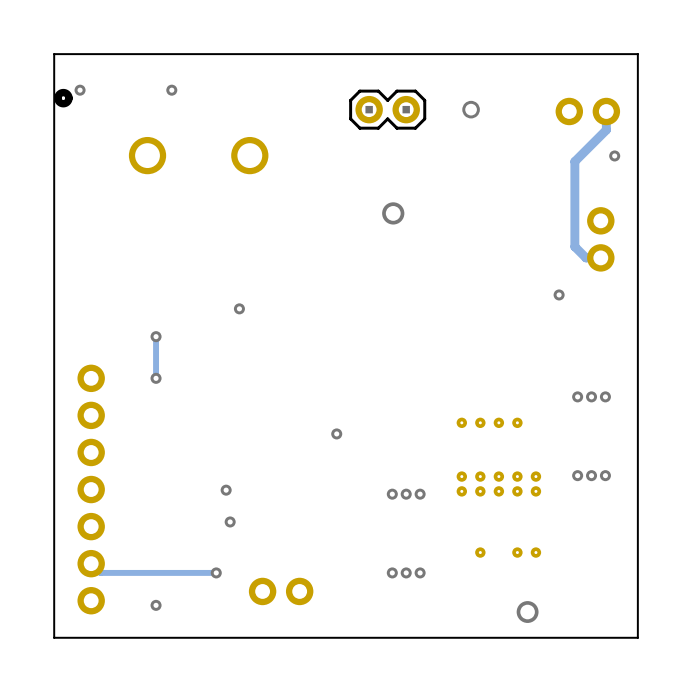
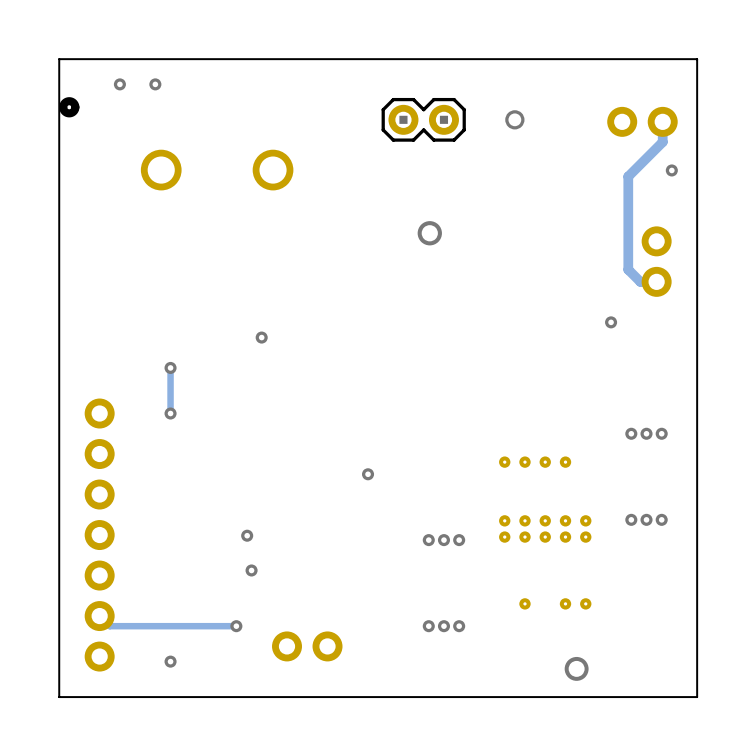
via: none -> (119, 84)
via: none -> (155, 84)
via: (80, 90) -> none
via: (171, 90) -> none

